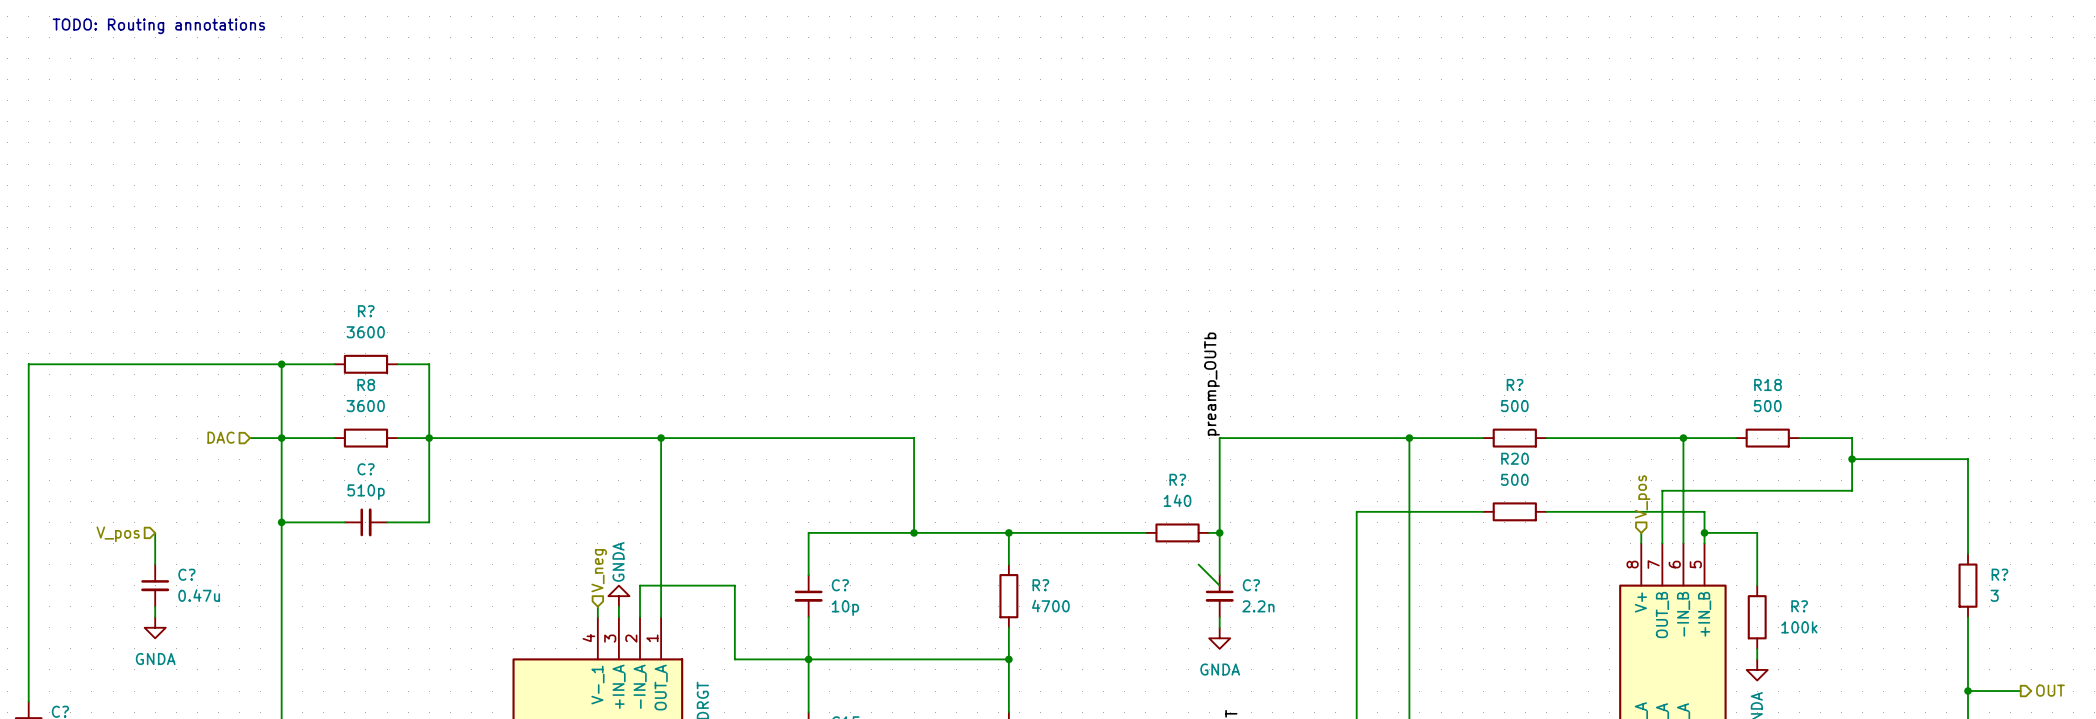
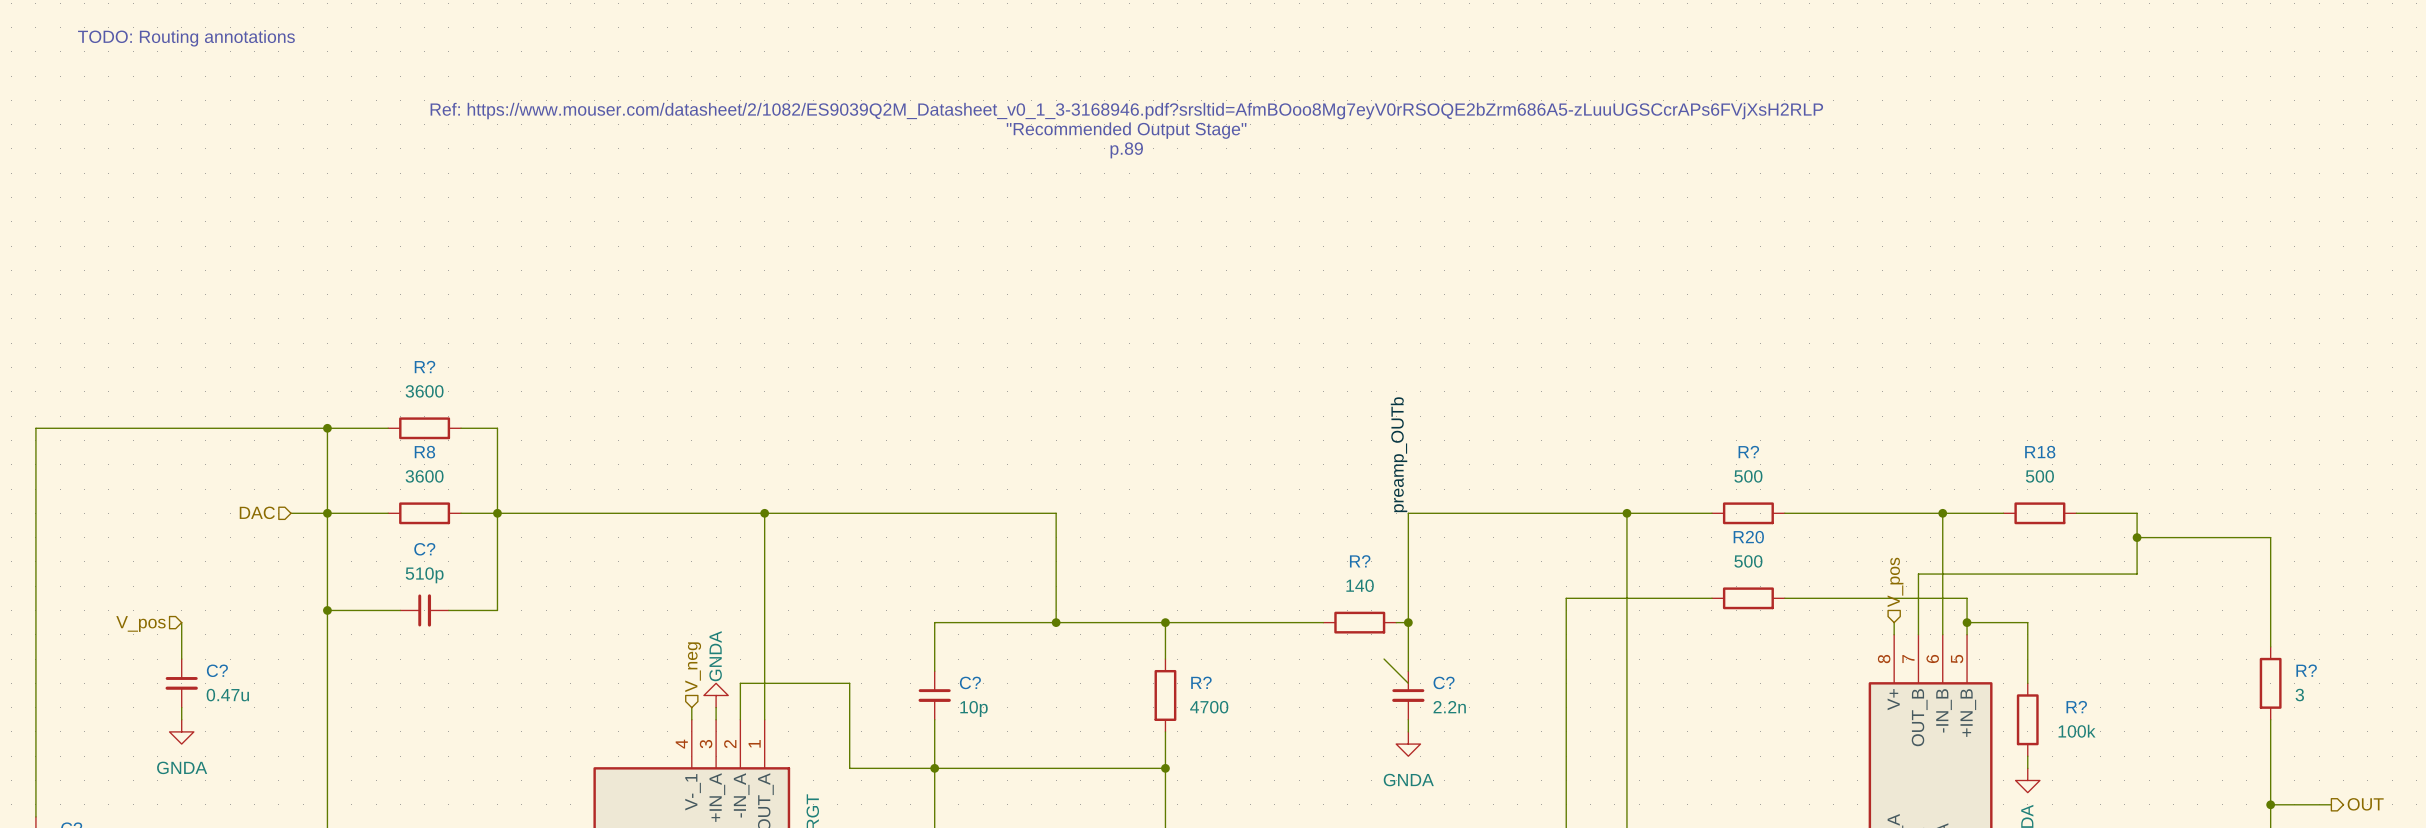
text: none -> Ref: https://www.mouser.com/datasheet/2/1082/ES9039Q2M_Datasheet_v0_1_3-3168946.pdf?srsltid=AfmBOoo8Mg7eyV0rRSOQE2bZrm686A5-zLuuUGSCcrAPs6FVjXsH2RLP (1126, 111)
text: none -> "Recommended Output Stage" (1126, 130)
text: none -> p.89 (1126, 150)

